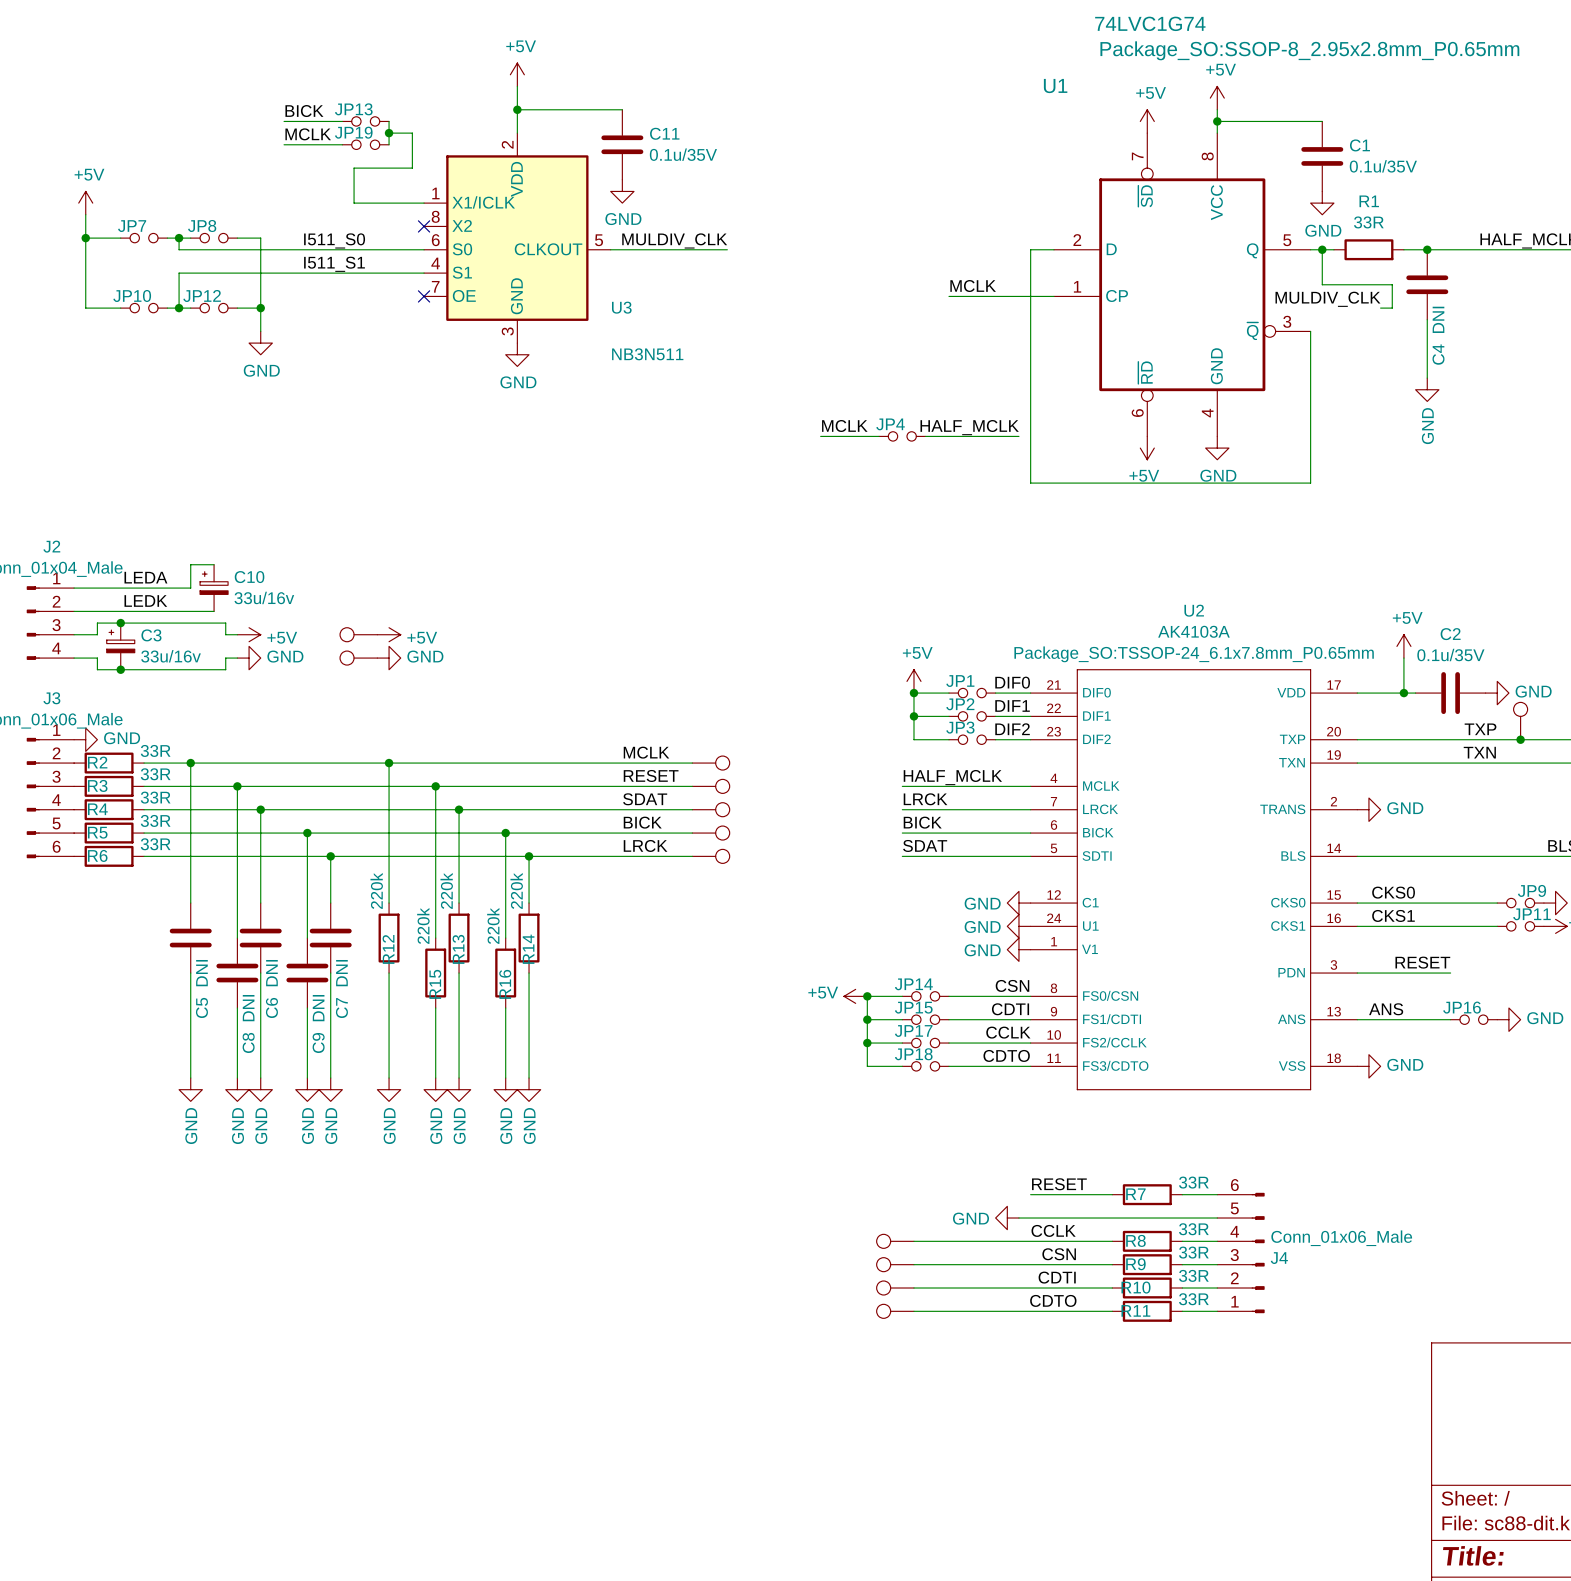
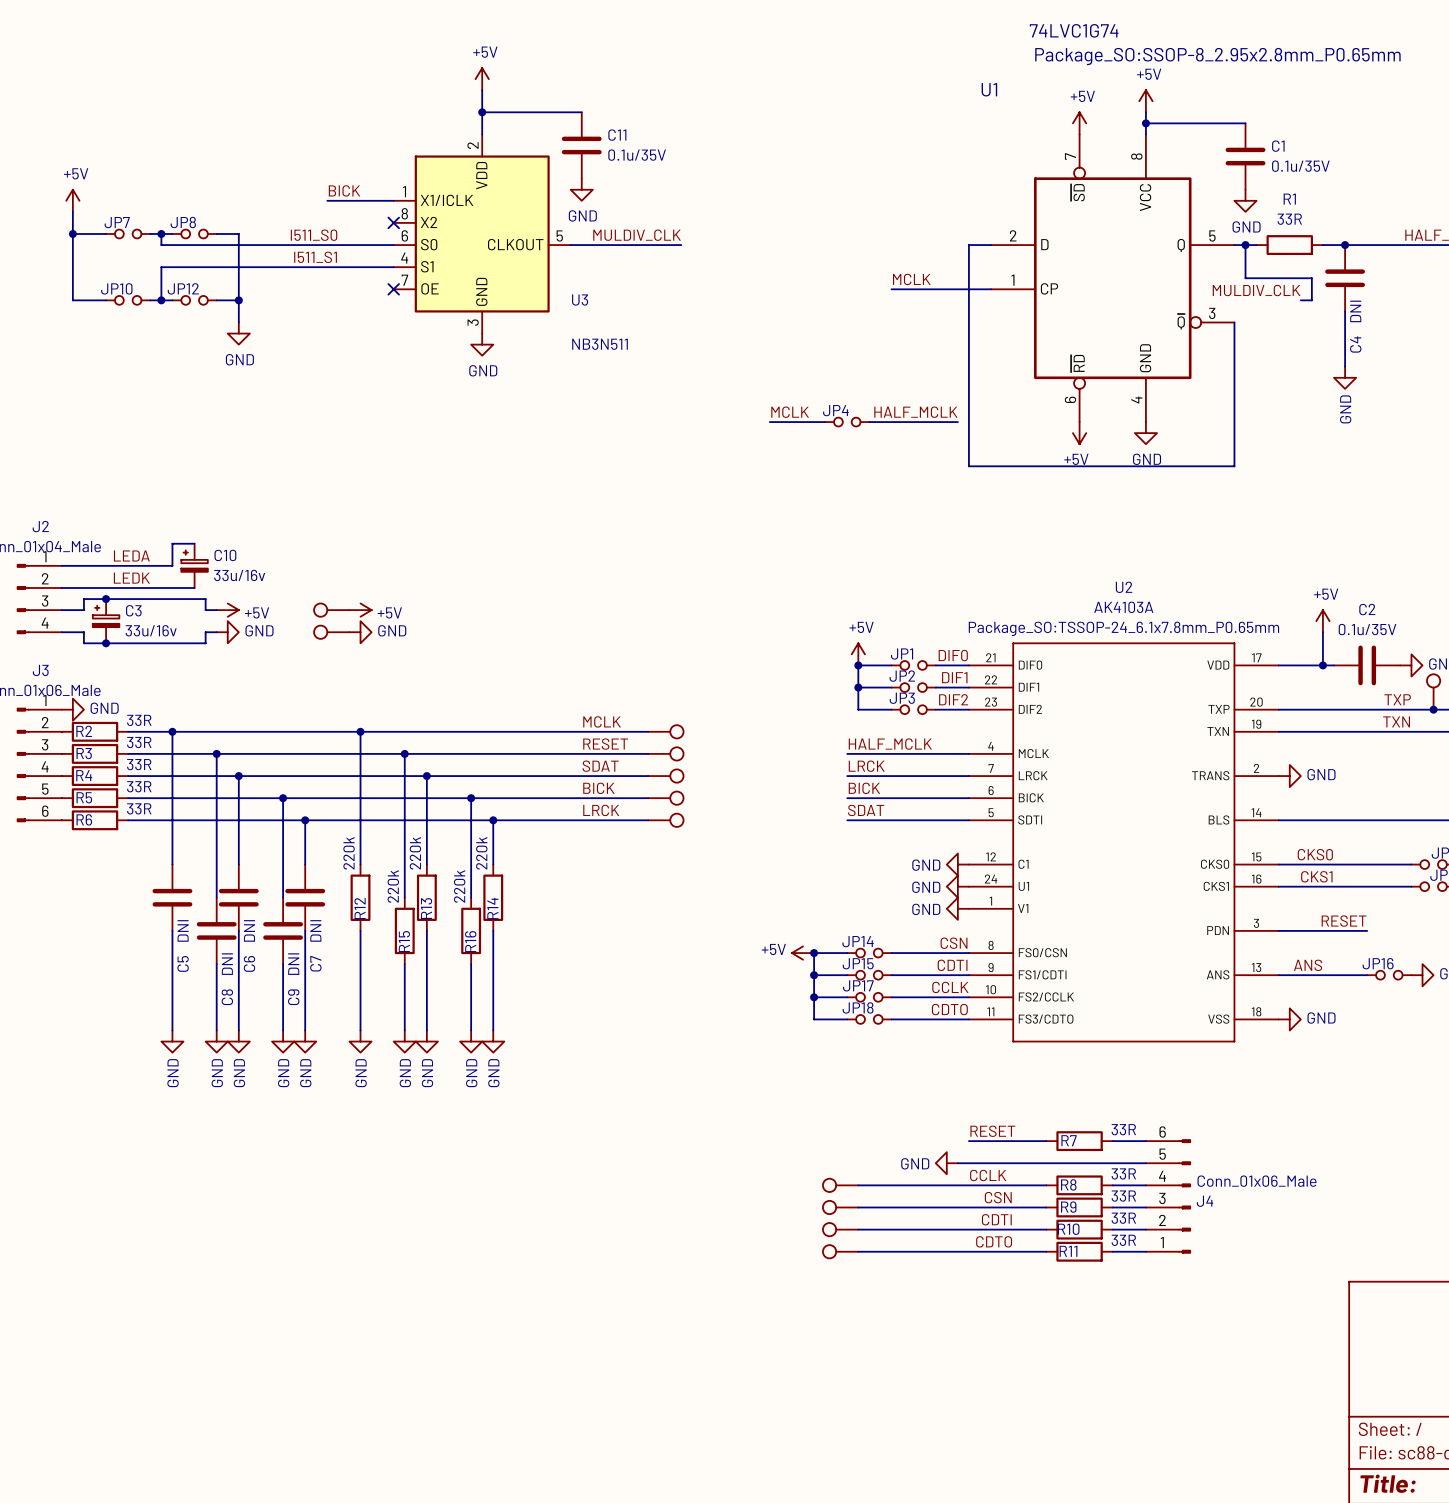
label position: BICK (304, 111) -> BICK (344, 190)
wire: (284, 121) (342, 121) -> none
JP13: (365, 121) -> none
wire: (389, 121) (389, 144) -> none
wire: (389, 133) (412, 133) (412, 168) (354, 168) (354, 203) -> none
junction: (389, 133) -> none
label: MCLK (308, 134) -> none
wire: (284, 144) (342, 144) -> none
JP19: (365, 144) -> none

